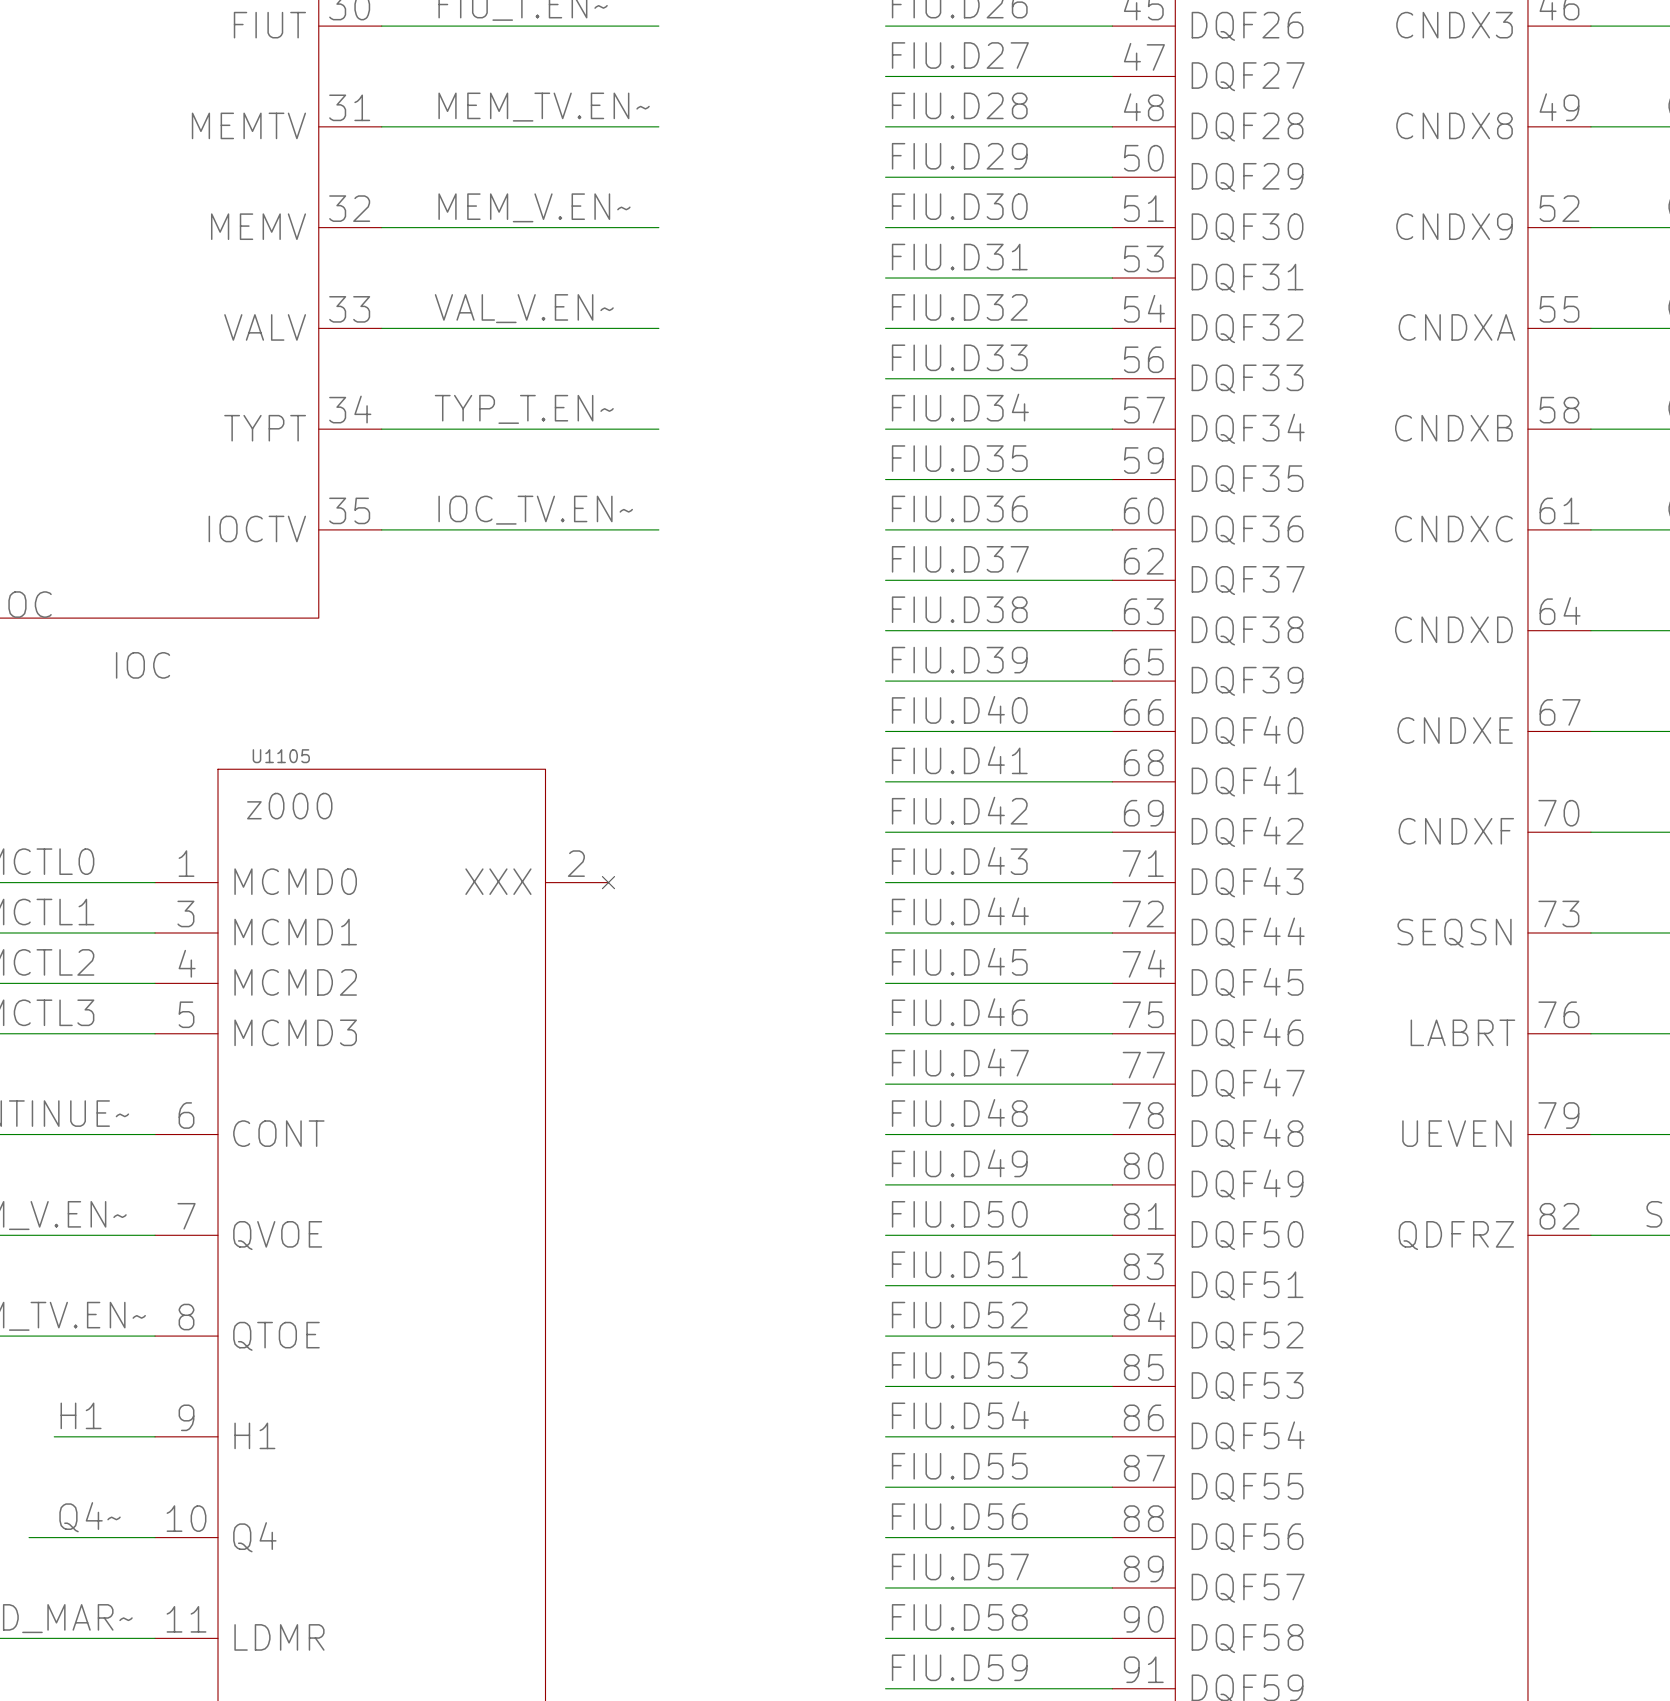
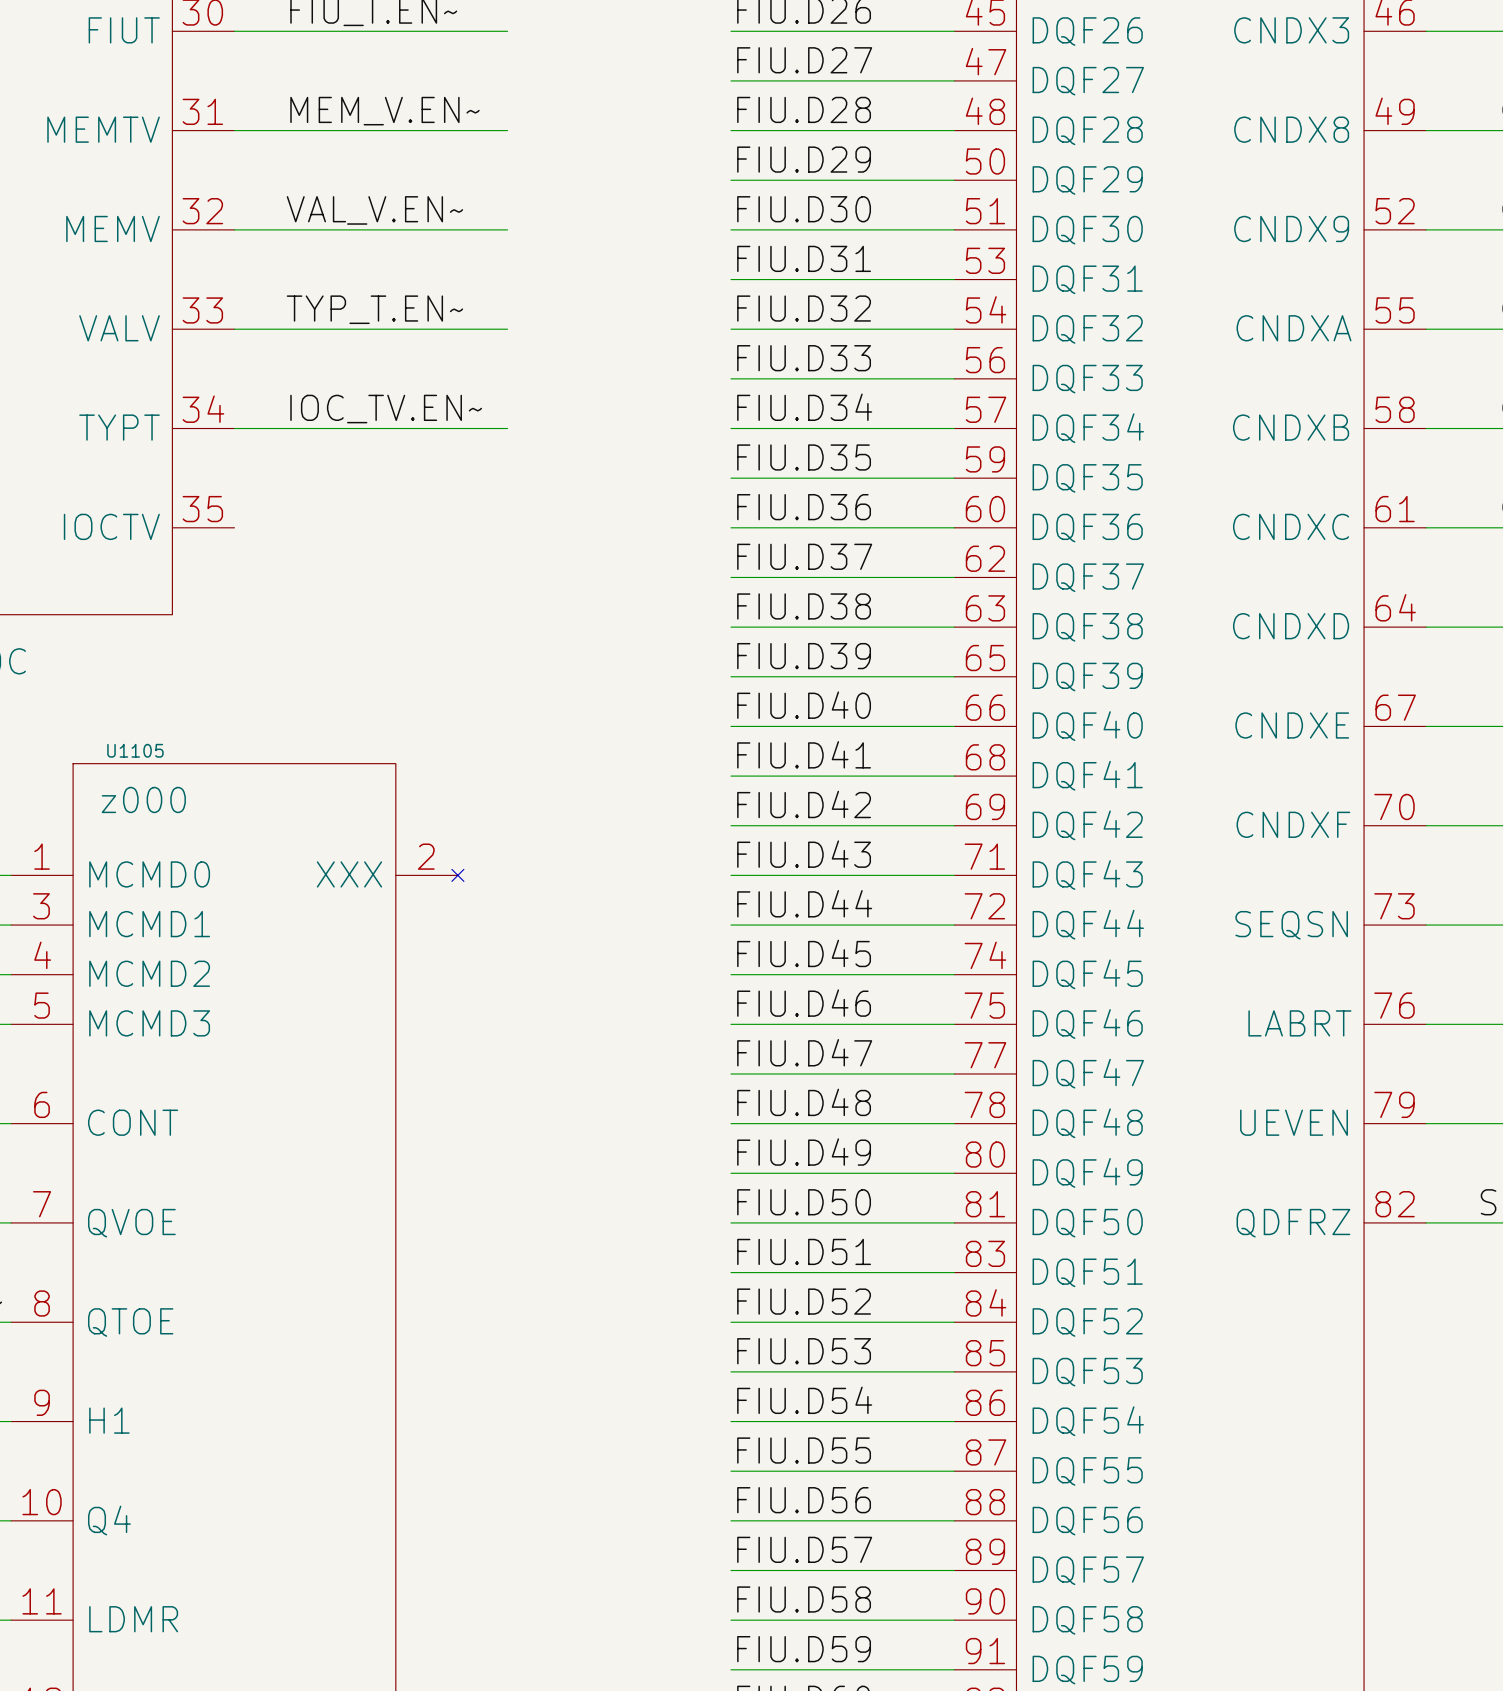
label: MEM_TV.EN~ (544, 107) -> MEM_V.EN~ (384, 111)
label: MEM_V.EN~ (534, 207) -> VAL_V.EN~ (374, 210)
label: VAL_V.EN~ (524, 308) -> TYP_T.EN~ (374, 309)
label: TYP_T.EN~ (524, 409) -> IOC_TV.EN~ (386, 409)
label: IOC_TV.EN~ (535, 510) -> none
wire: (381, 529) (658, 529) -> none

